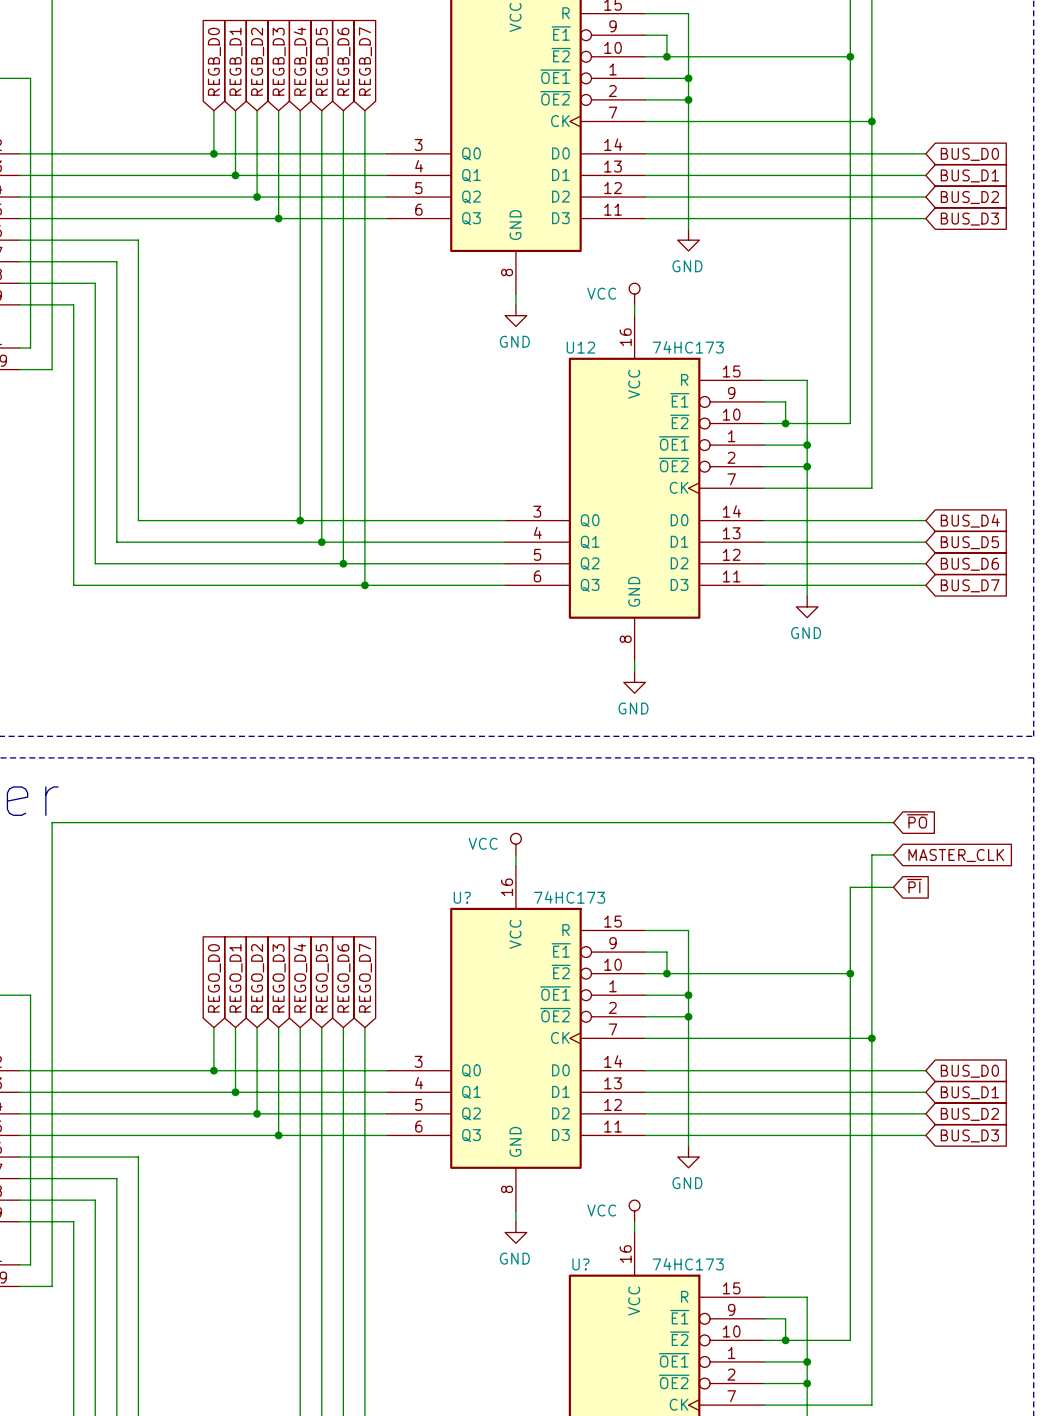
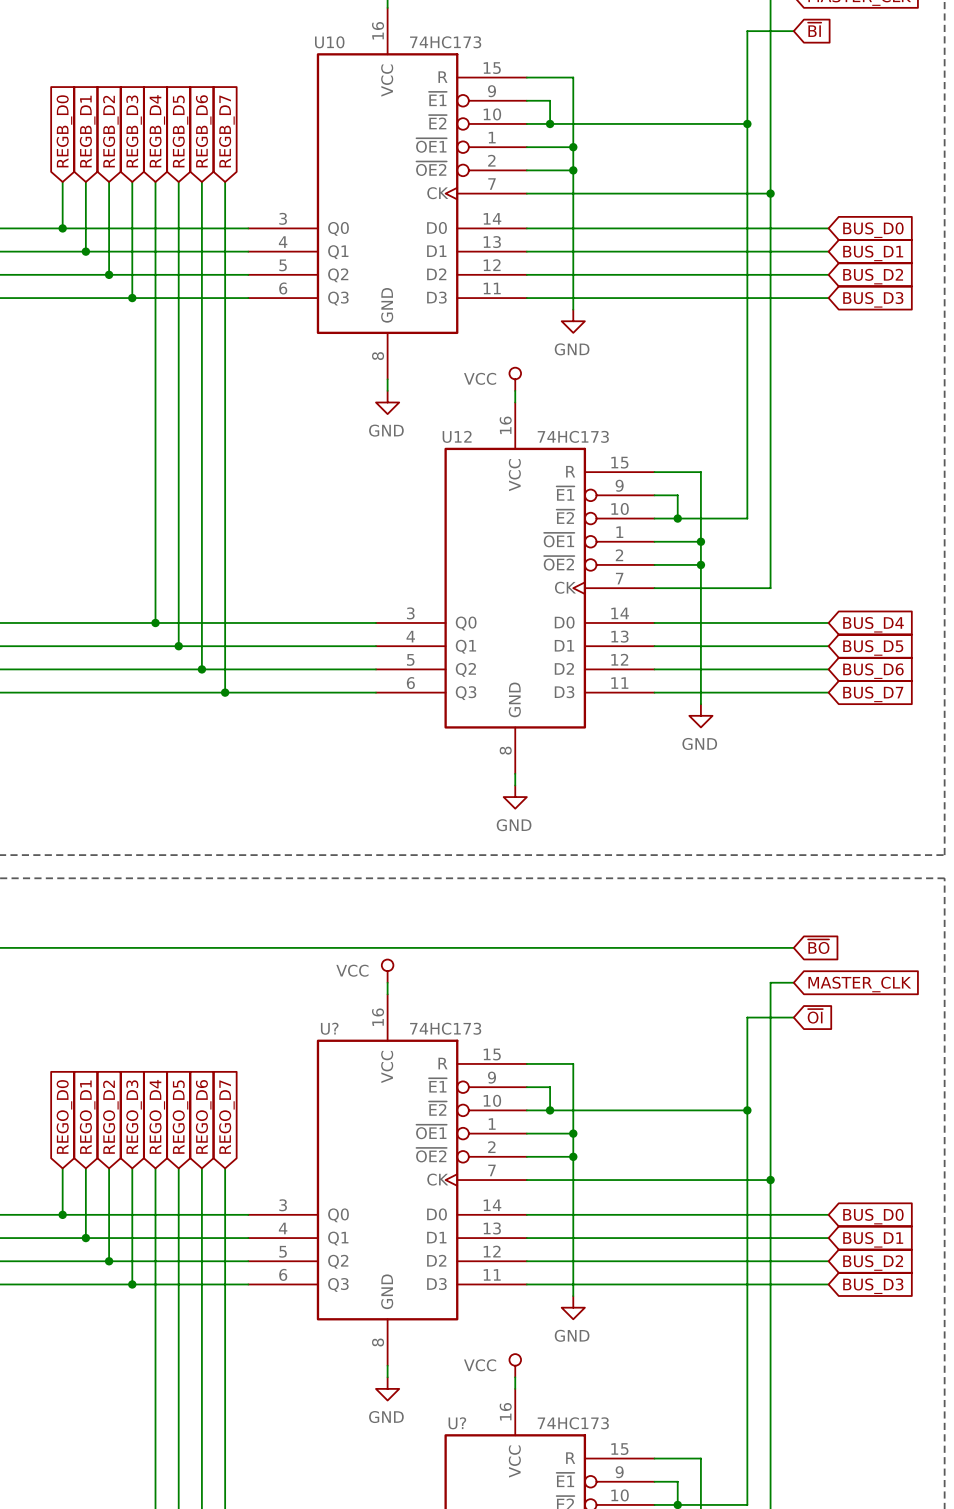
global label: ~{PO} (917, 821) -> ~{BO} (818, 946)
global label: ~{PI} (914, 886) -> ~{OI} (815, 1016)

